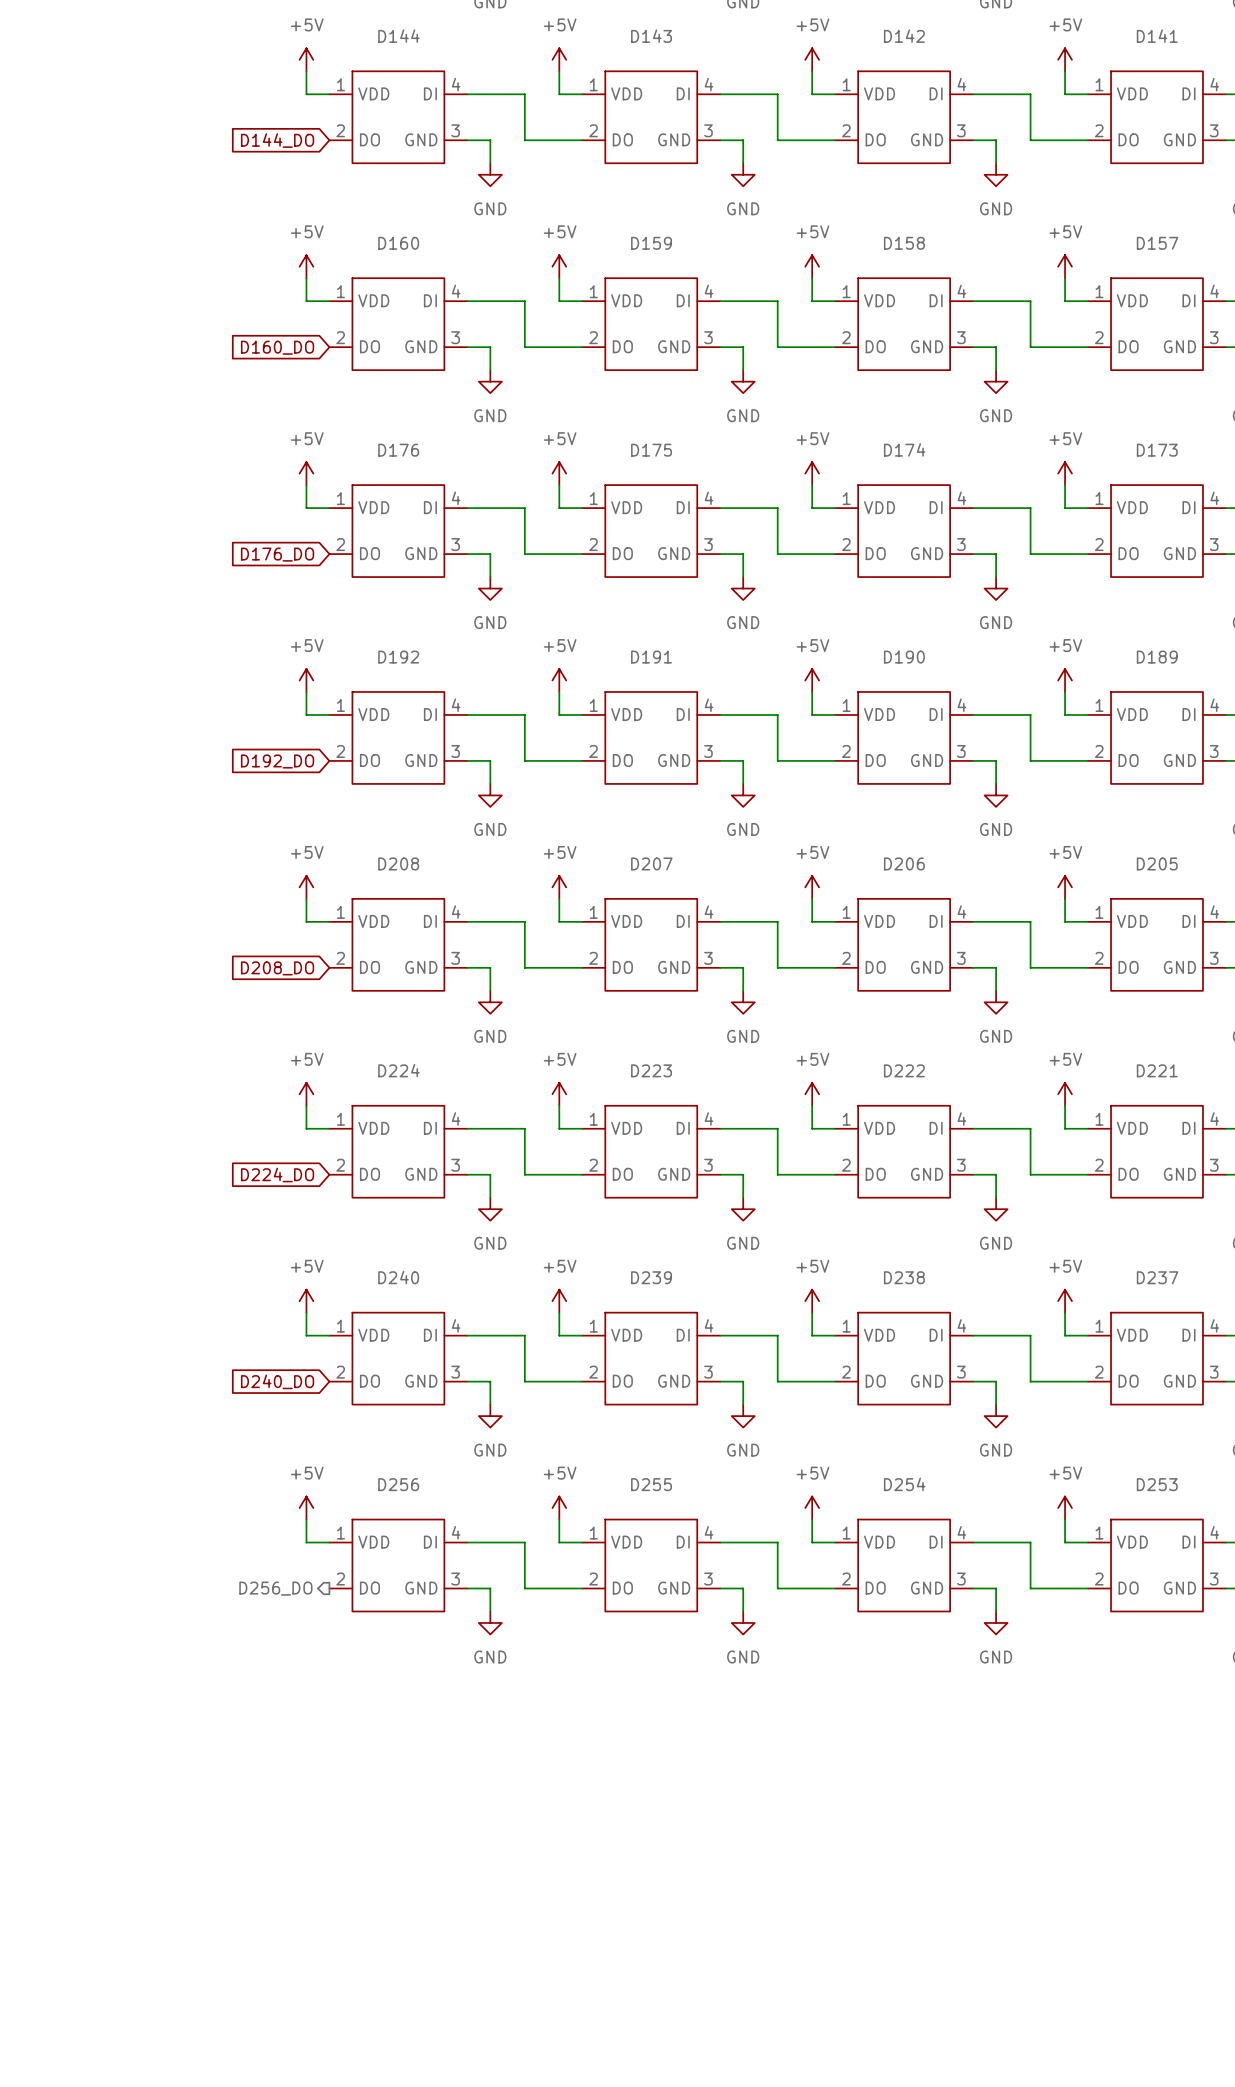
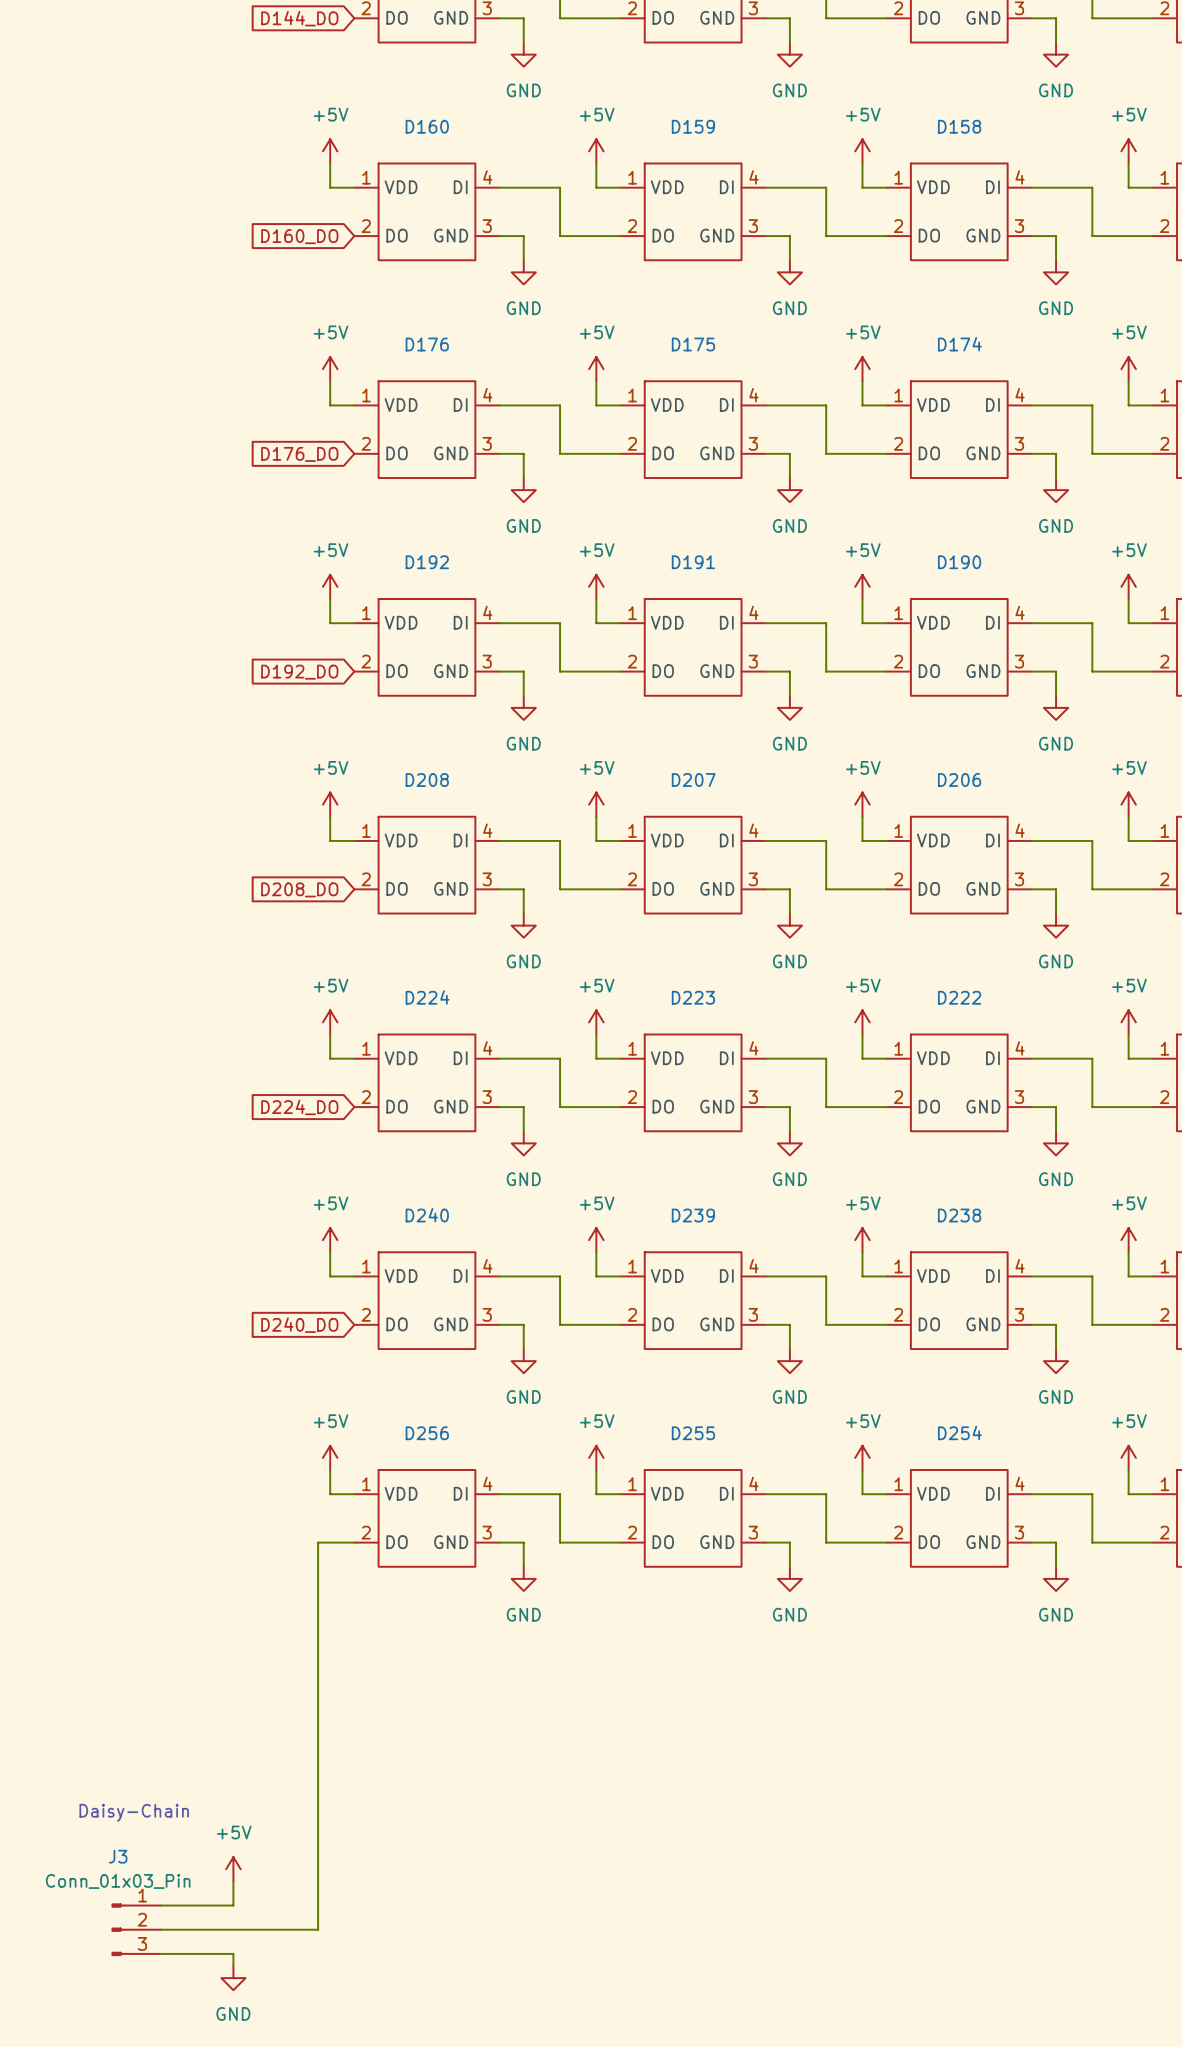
hierarchical label: D256_DO (275, 1588) -> none
wire: none -> (354, 1542) (318, 1542) (318, 1929) (160, 1929)
text: none -> Daisy-Chain (134, 1812)
power symbol: none -> +5V (233, 1869)
wire: none -> (233, 1881) (233, 1905) (160, 1905)
J3: none -> Conn_01x03_Pin (136, 1929)
wire: none -> (160, 1953) (233, 1953) (233, 1966)
power symbol: none -> GND (233, 1978)

